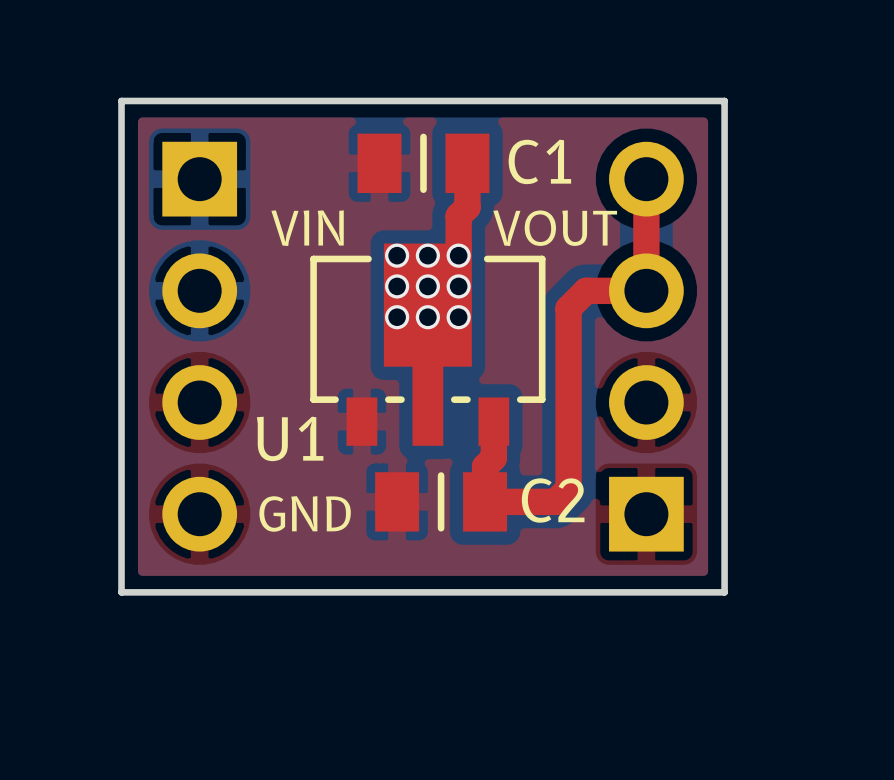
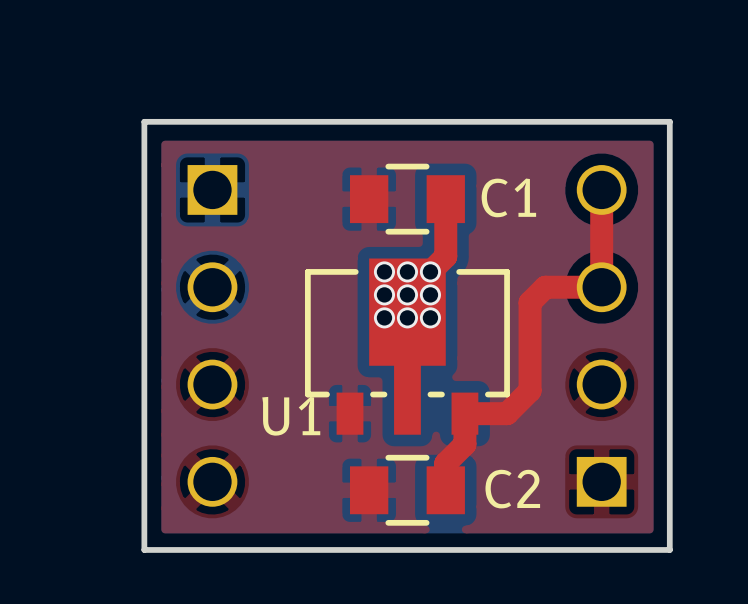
C1 footprint: [357, 133, 490, 194] -> [350, 163, 465, 235]
part footprint: [162, 141, 238, 552] -> [187, 165, 238, 507]
part footprint: [609, 141, 684, 552] -> [576, 165, 627, 507]
C1 name position: C1 (539, 161) -> C1 (508, 197)
top track: (467, 207) (458, 216) (458, 255) -> (445, 214) (445, 256) (430, 271)
text: VIN (307, 228) -> none
text: VOUT (555, 228) -> none
via: (397, 255) -> none
via: (427, 255) -> none
via: (458, 255) -> none
via: none -> (384, 271)
via: none -> (407, 271)
via: none -> (430, 271)
via: (397, 286) -> none
via: (427, 286) -> none
via: (458, 286) -> none
top track: (586, 290) (568, 308) (568, 488) (555, 501) (485, 501) (485, 466) (493, 457) (493, 421) -> (549, 287) (545, 287) (530, 302) (530, 390) (507, 413) (464, 413) (464, 444) (445, 463) (445, 490)
via: none -> (384, 294)
via: none -> (407, 294)
via: none -> (430, 294)
via: (397, 317) -> none
via: (427, 317) -> none
via: (458, 317) -> none
via: none -> (384, 317)
via: none -> (407, 317)
via: none -> (430, 317)
U1 position: (427, 344) -> (407, 346)
C2 footprint: [375, 472, 508, 532] -> [350, 454, 465, 526]
text: GND (305, 513) -> none

